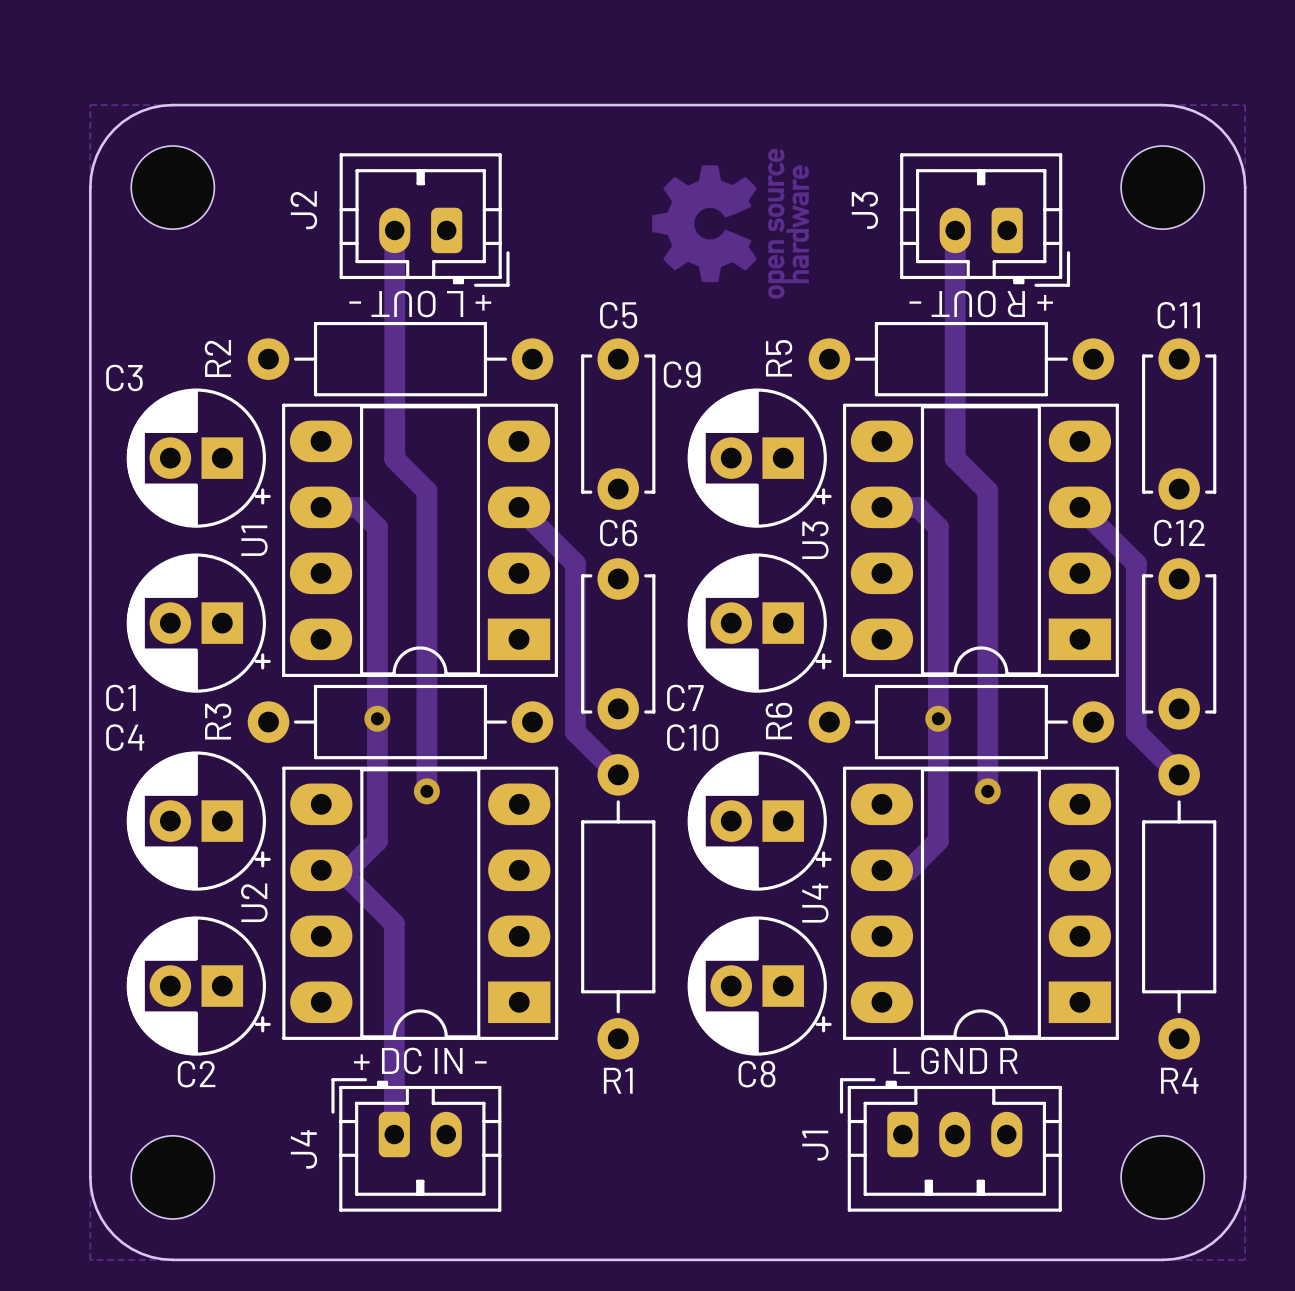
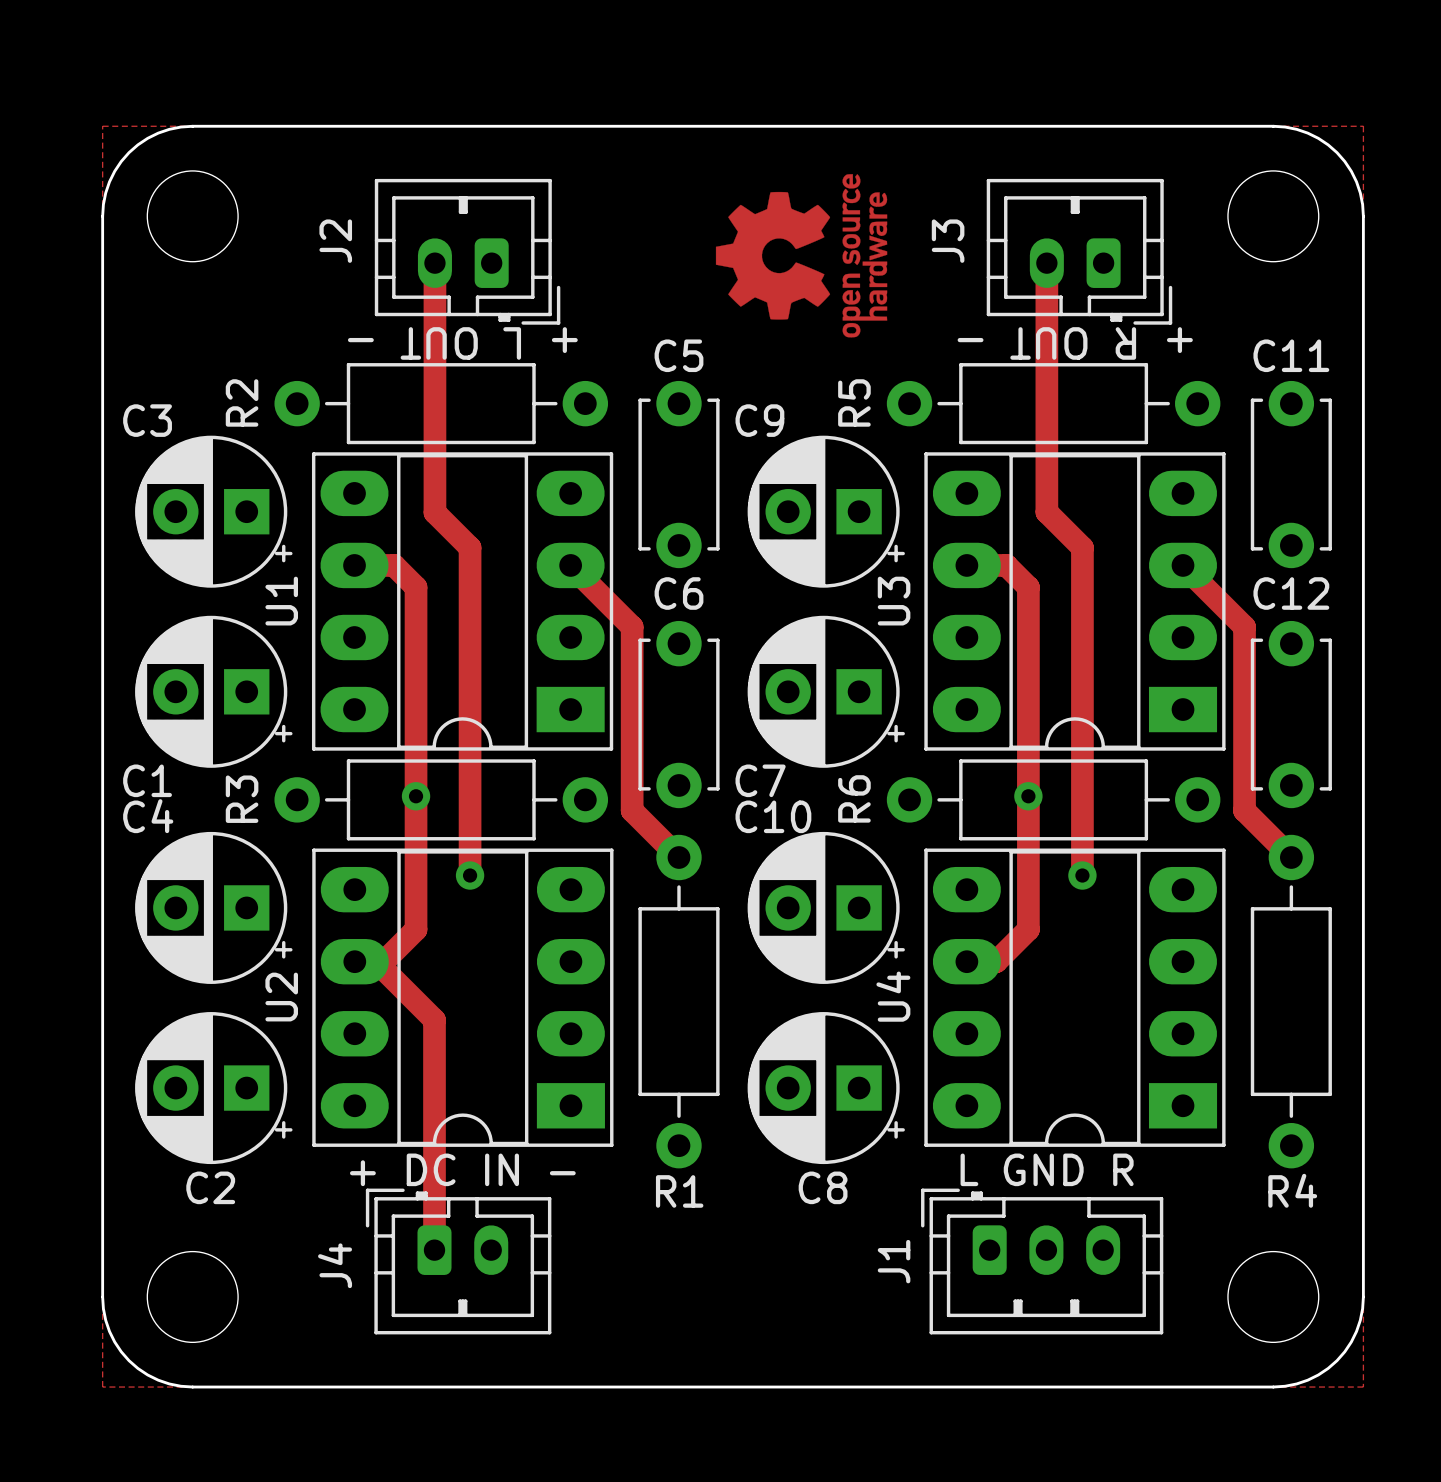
C3 footprint: [126, 388, 271, 528] -> [135, 435, 293, 588]
C9 footprint: [687, 388, 832, 528] -> [747, 435, 905, 588]
C1 footprint: [126, 553, 271, 693] -> [135, 615, 293, 768]
C7 footprint: [687, 553, 832, 693] -> [747, 615, 905, 768]
C4 footprint: [126, 751, 271, 891] -> [135, 831, 293, 984]
C10 footprint: [687, 751, 832, 891] -> [747, 831, 905, 984]
C2 footprint: [126, 916, 271, 1056] -> [135, 1012, 293, 1165]
C8 footprint: [687, 916, 832, 1056] -> [747, 1012, 905, 1165]

